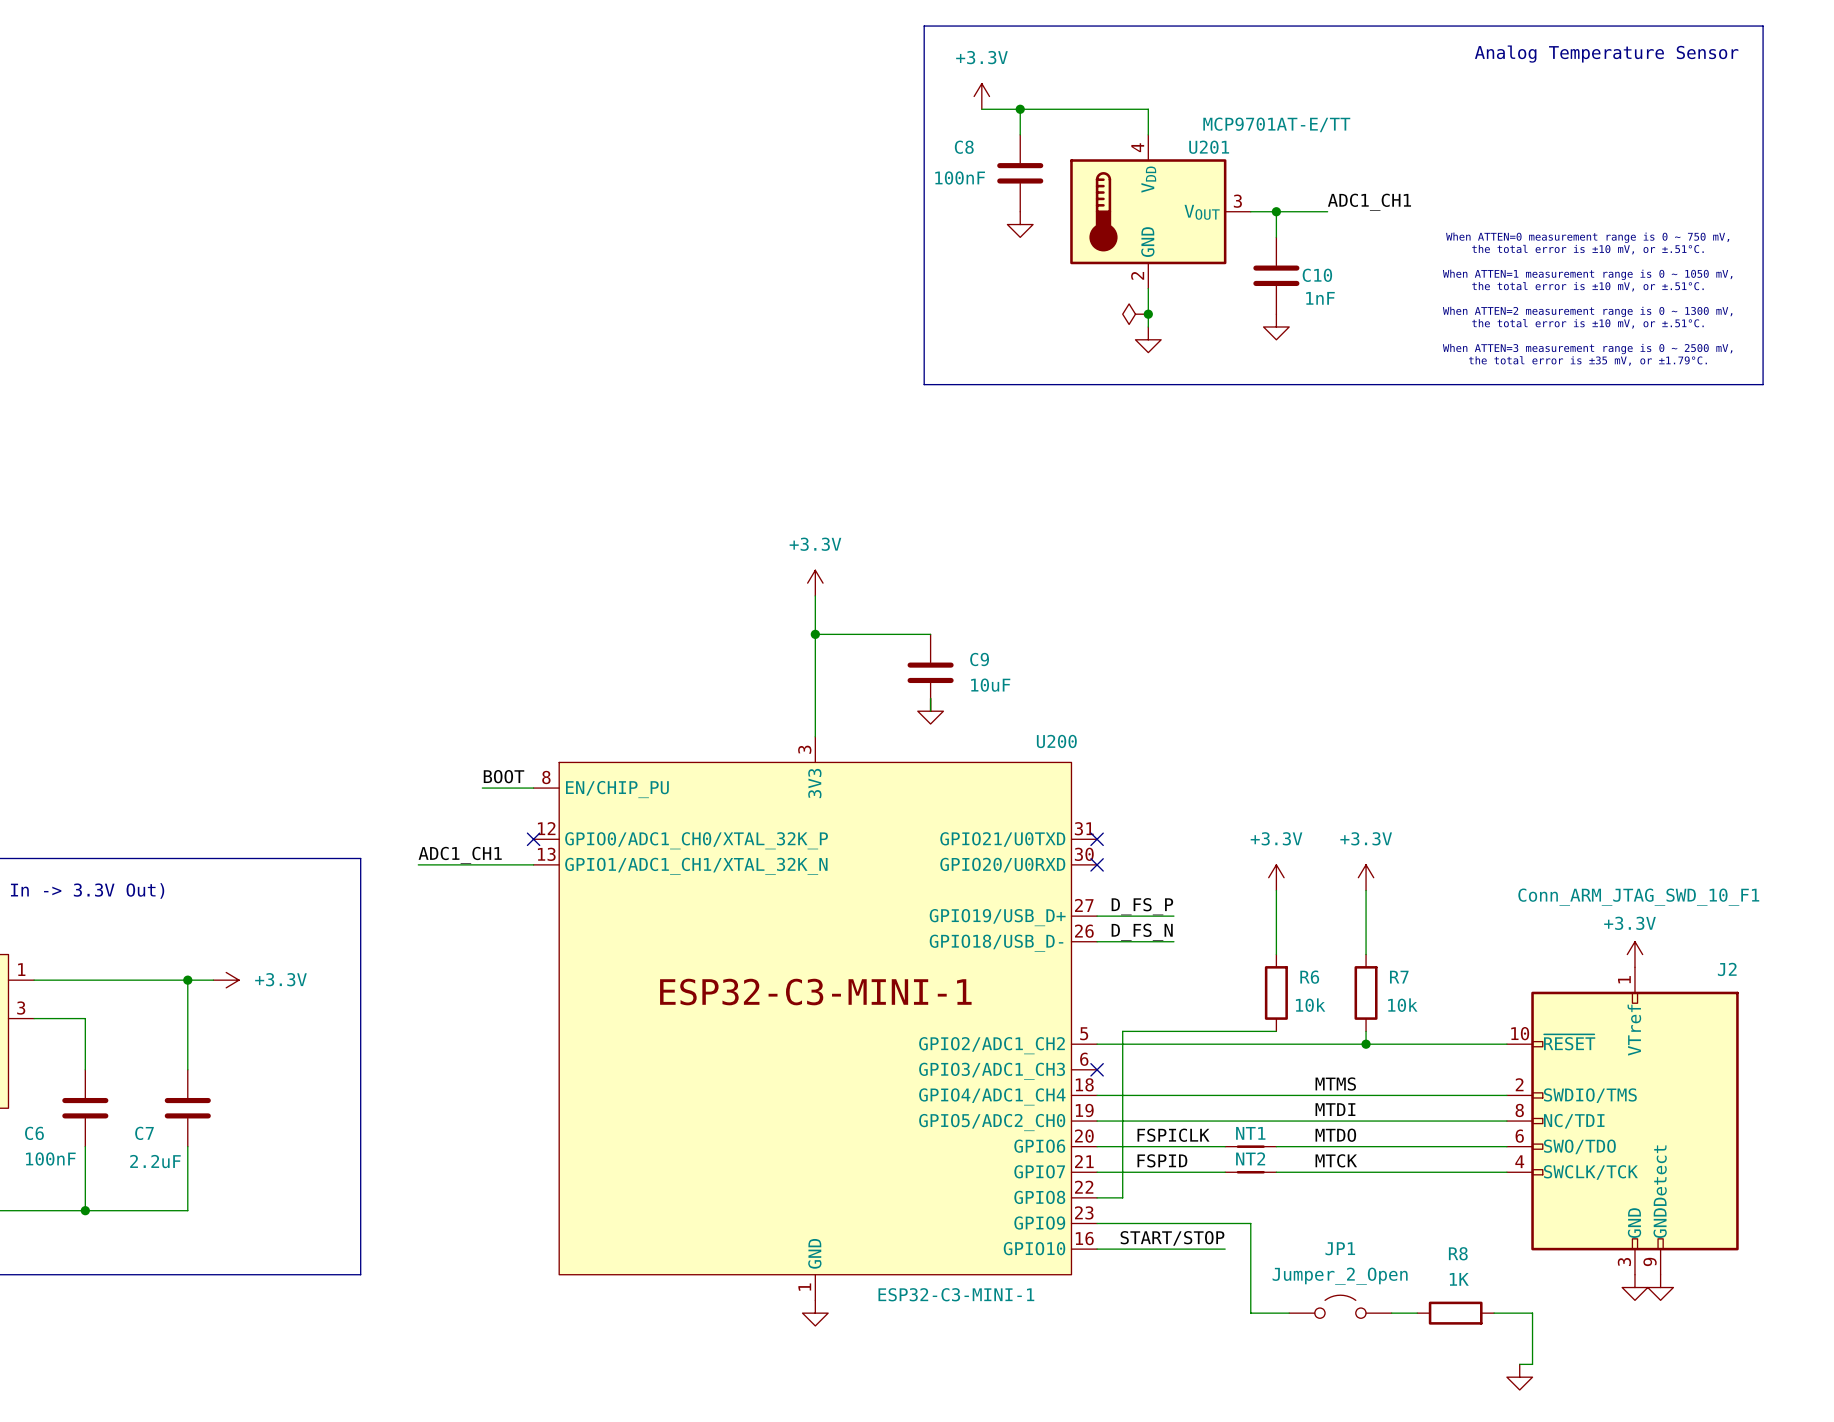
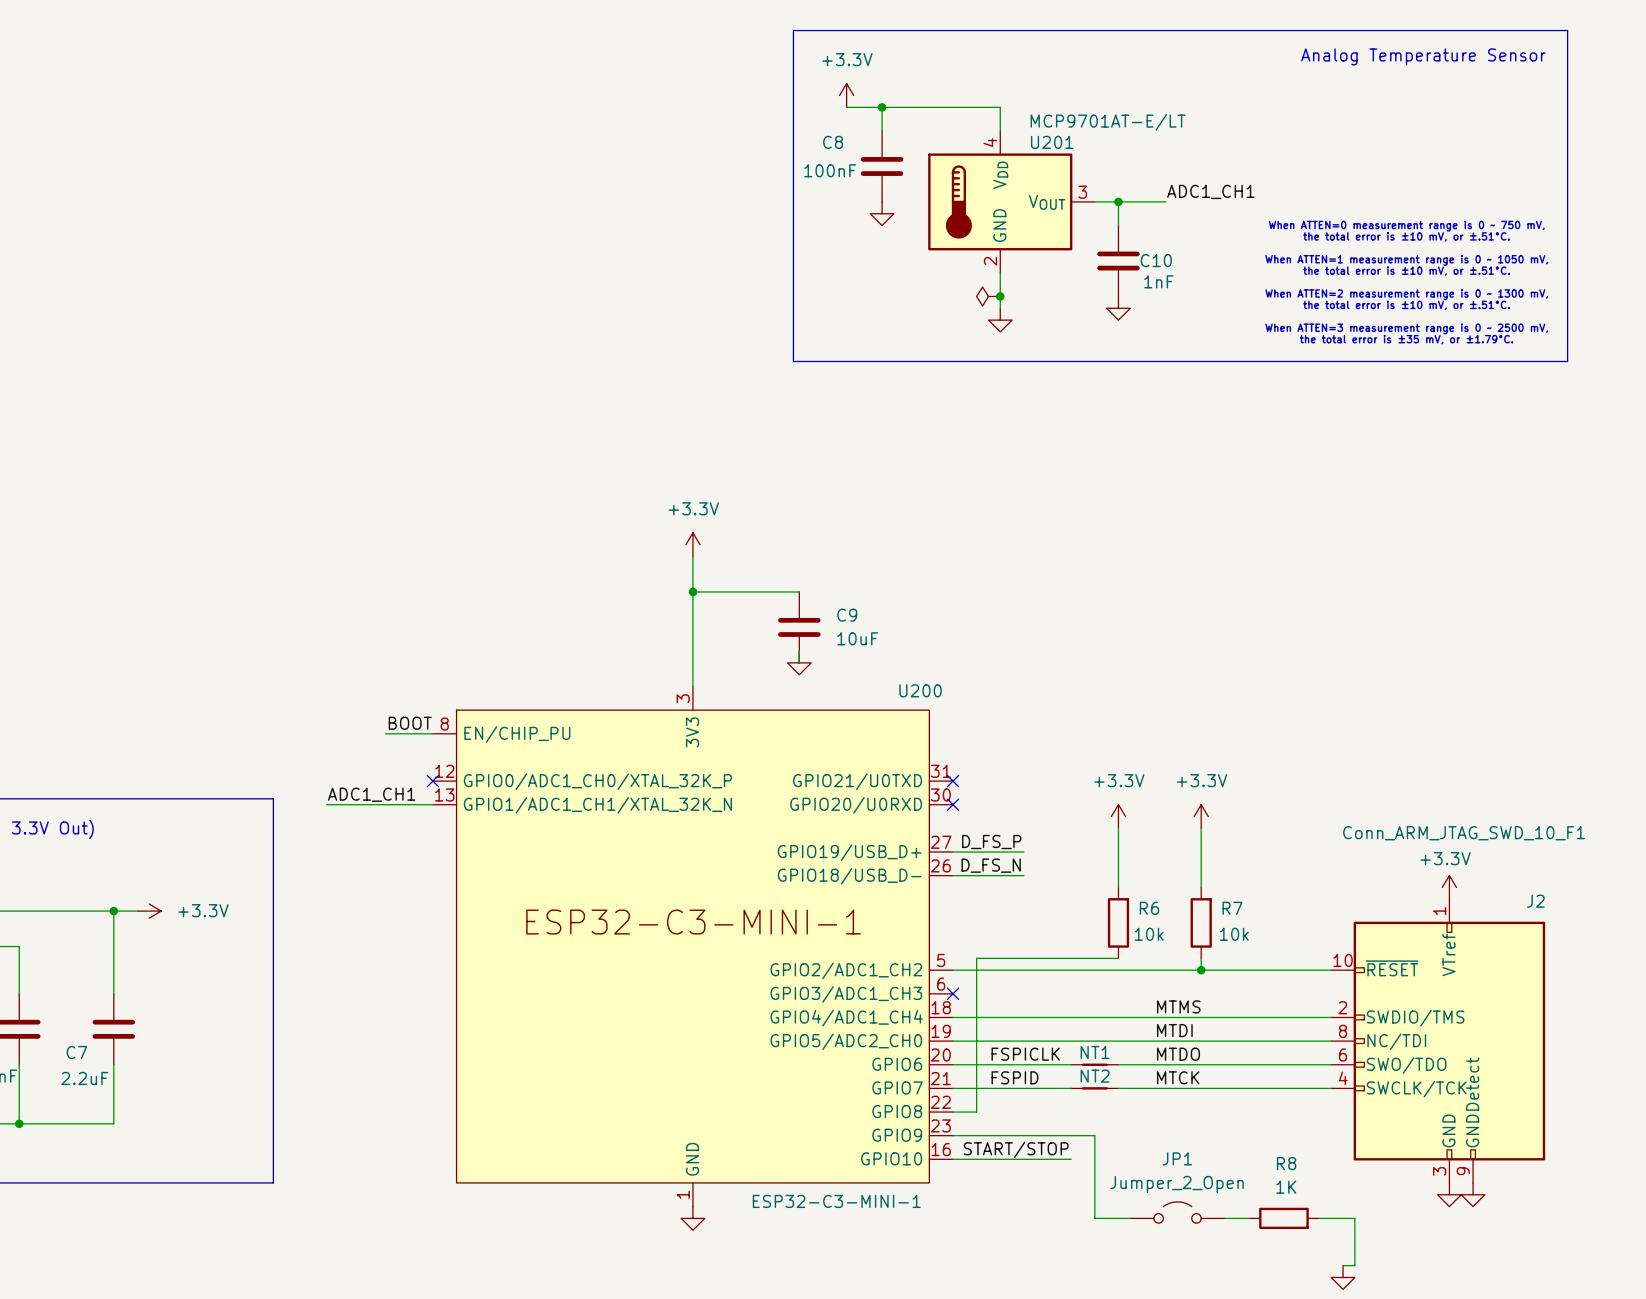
U201 value: MCP9701AT-E/TT (1276, 124) -> MCP9701AT-E/LT (1108, 122)

